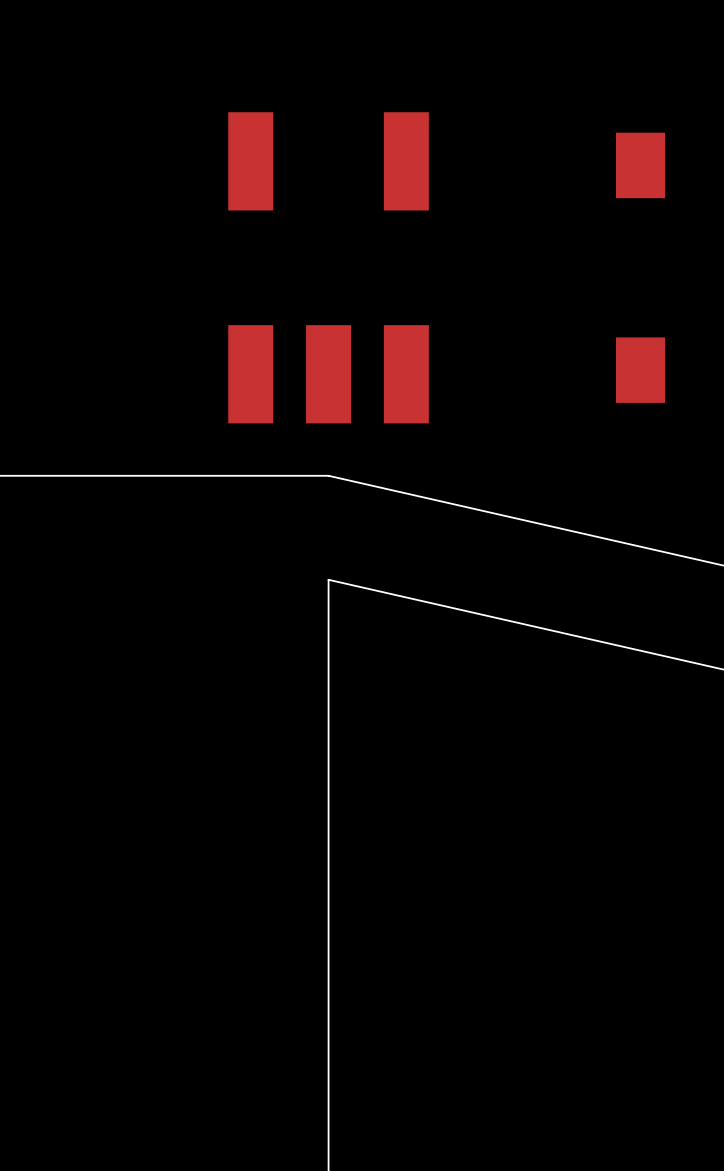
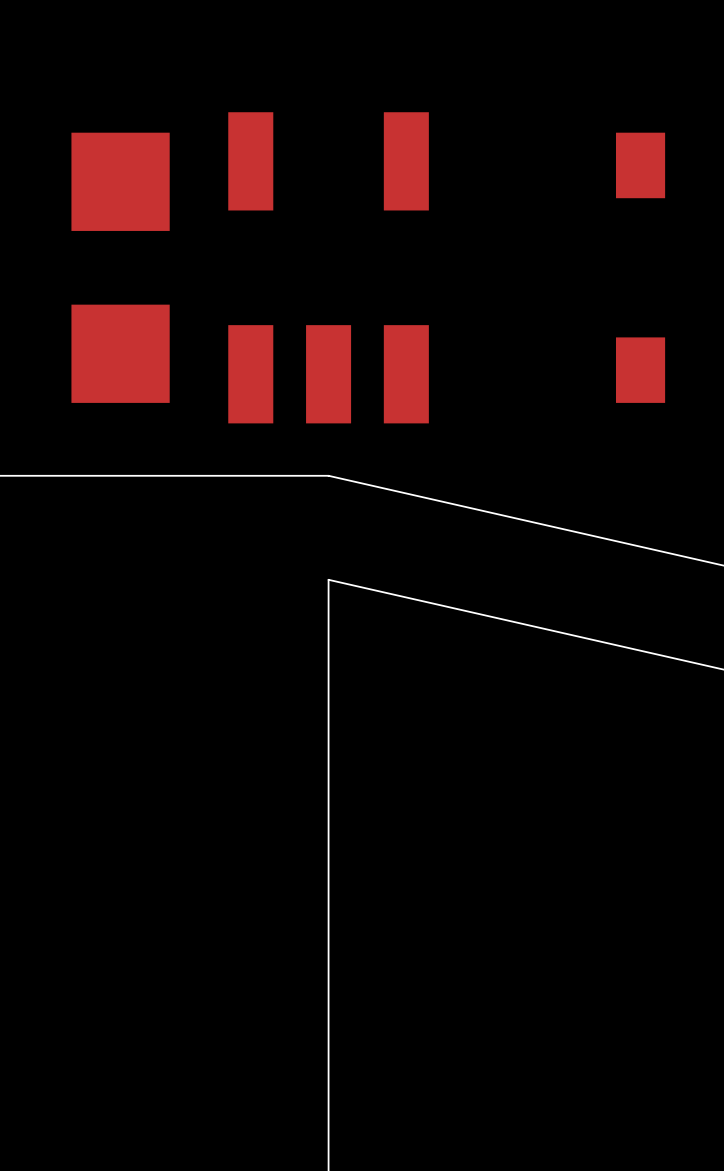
part: none -> (120, 267)

